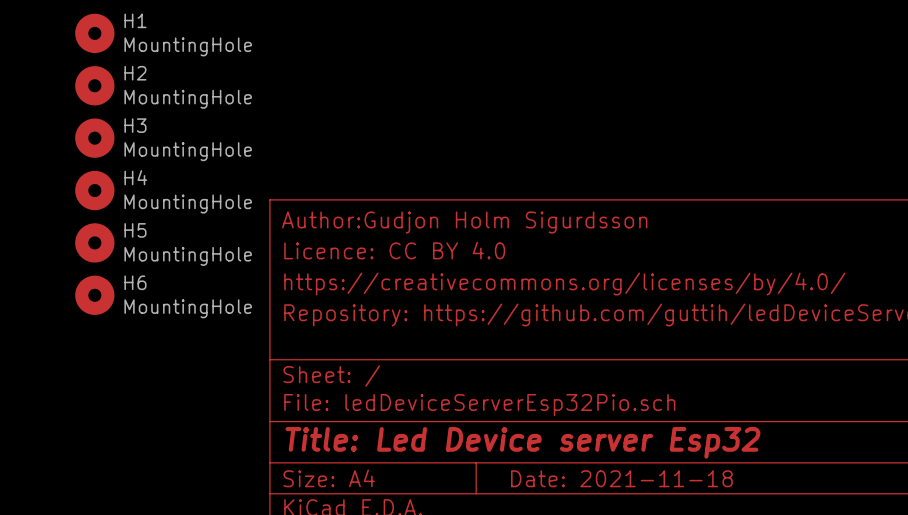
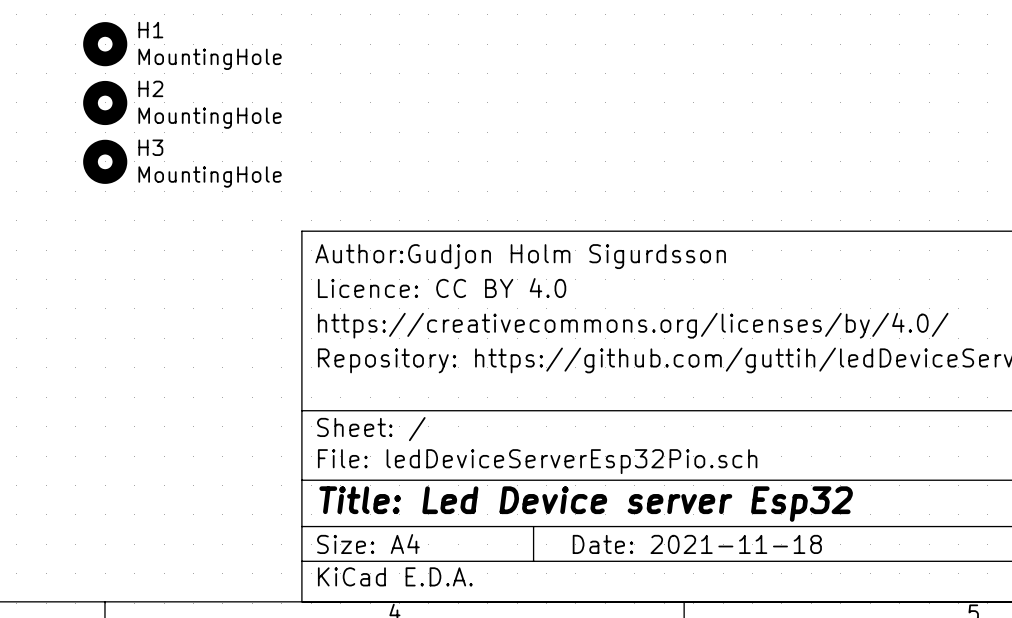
H4: MountingHole (94, 190) -> none
H5: MountingHole (94, 242) -> none
H6: MountingHole (94, 295) -> none

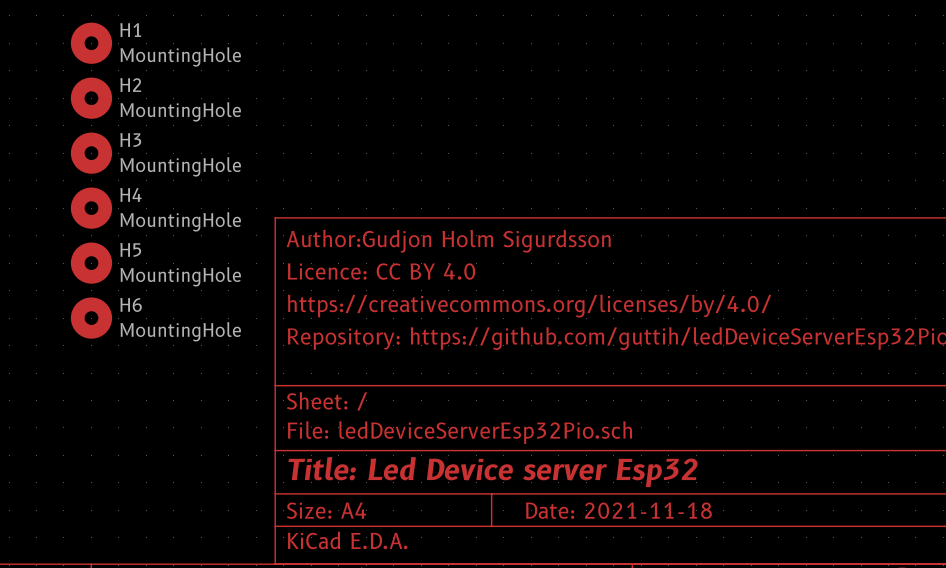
H4: none -> MountingHole (91, 208)
H5: none -> MountingHole (91, 263)
H6: none -> MountingHole (91, 318)

